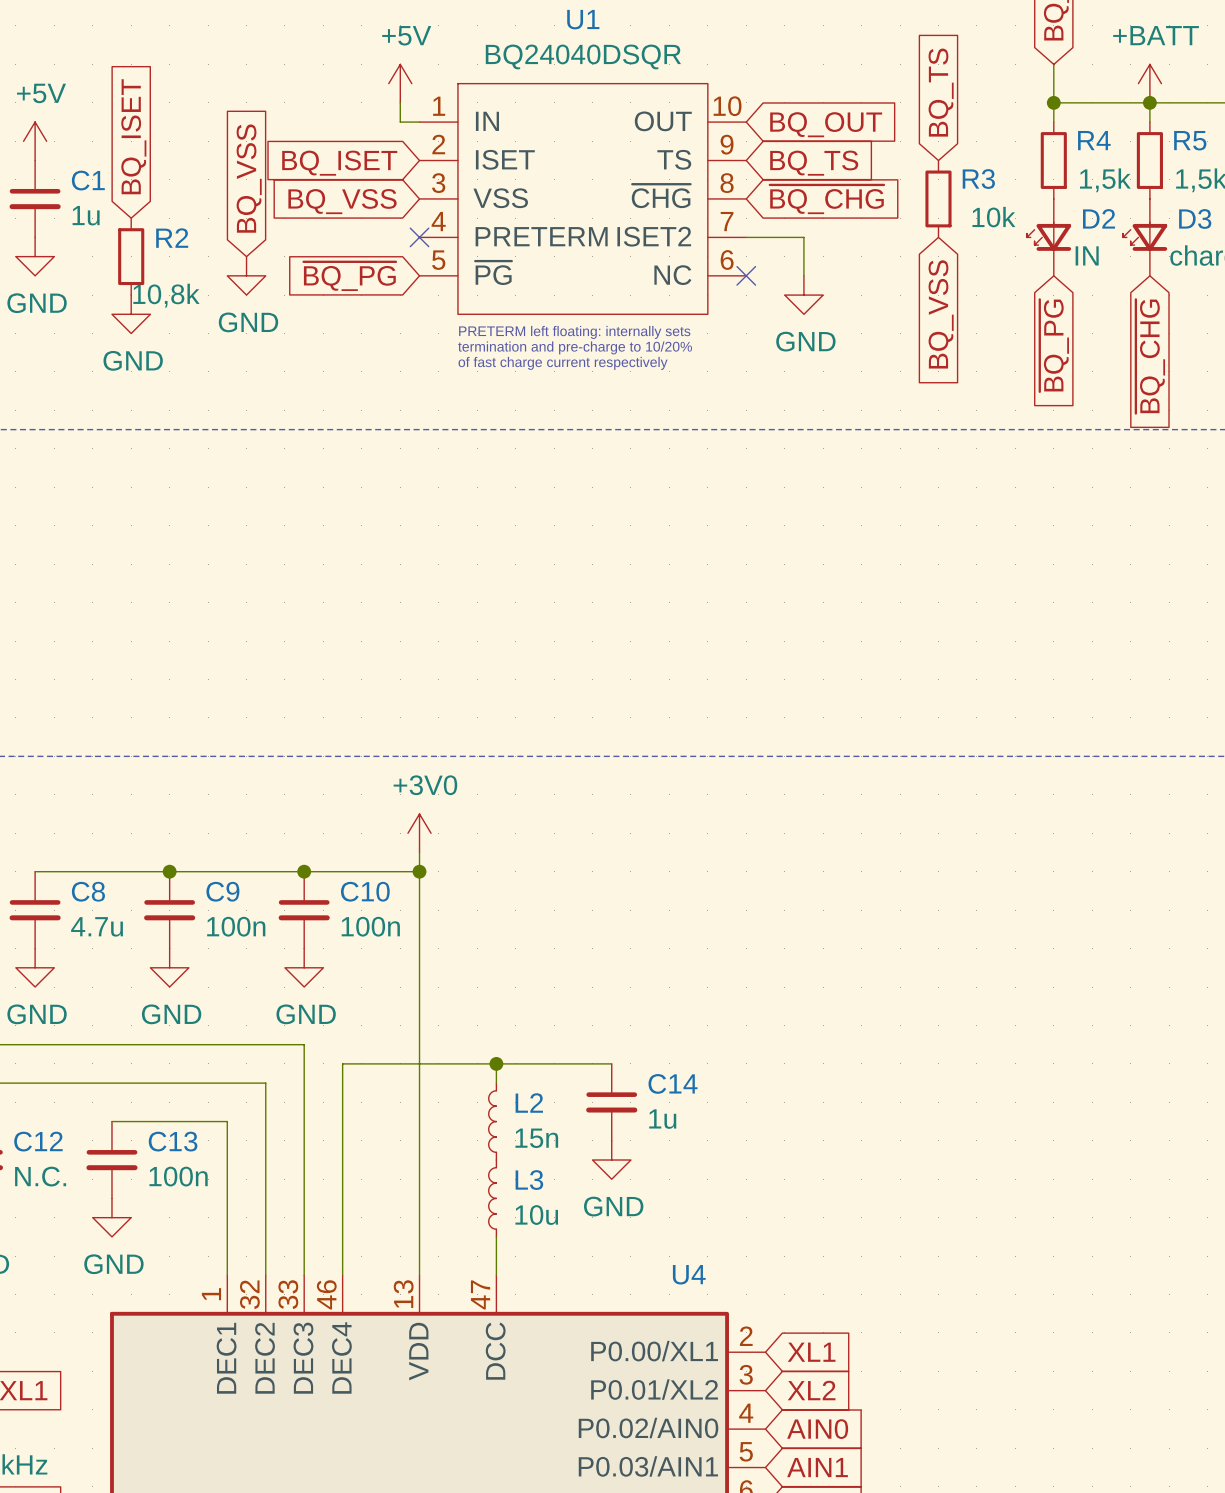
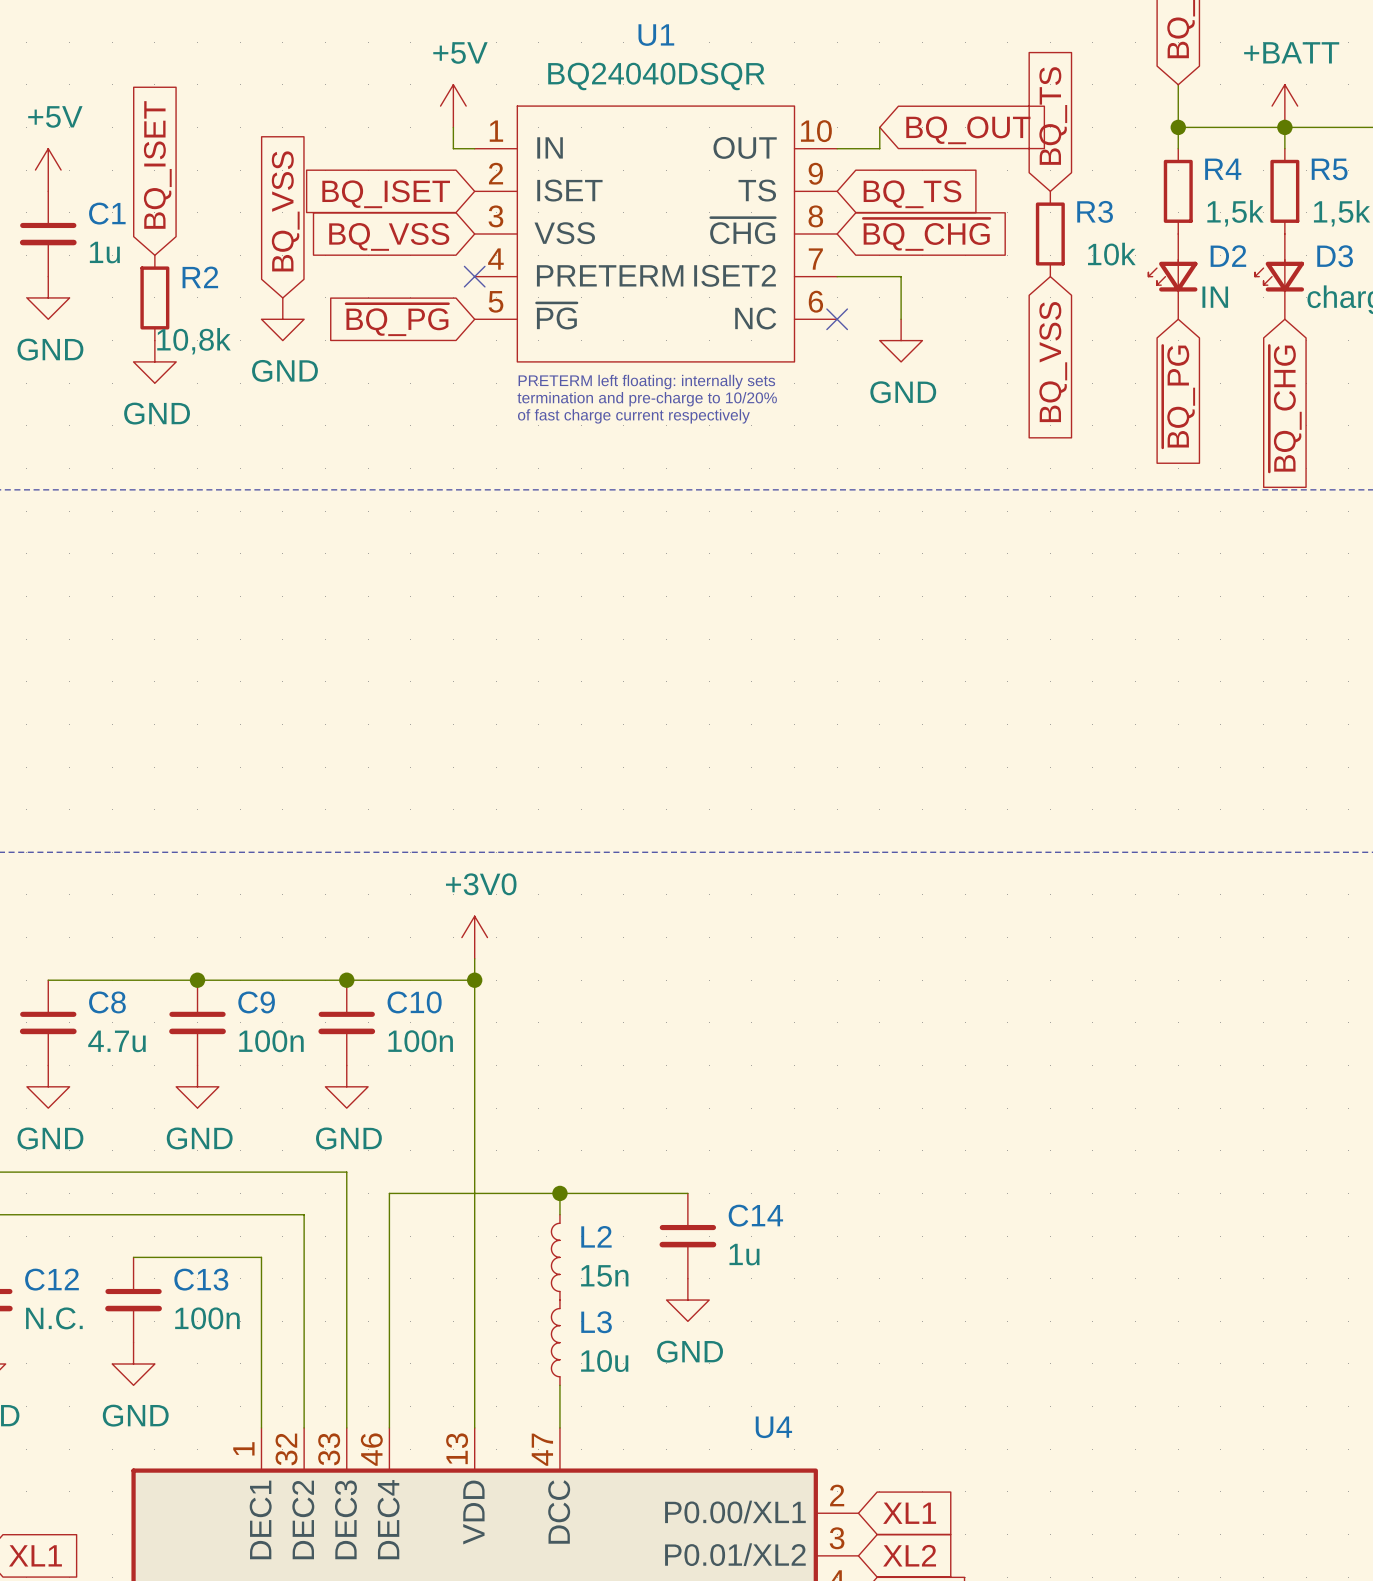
wire: none -> (879, 127) (879, 148) (837, 148)
global label position: BQ_OUT (826, 124) -> BQ_OUT (968, 130)

